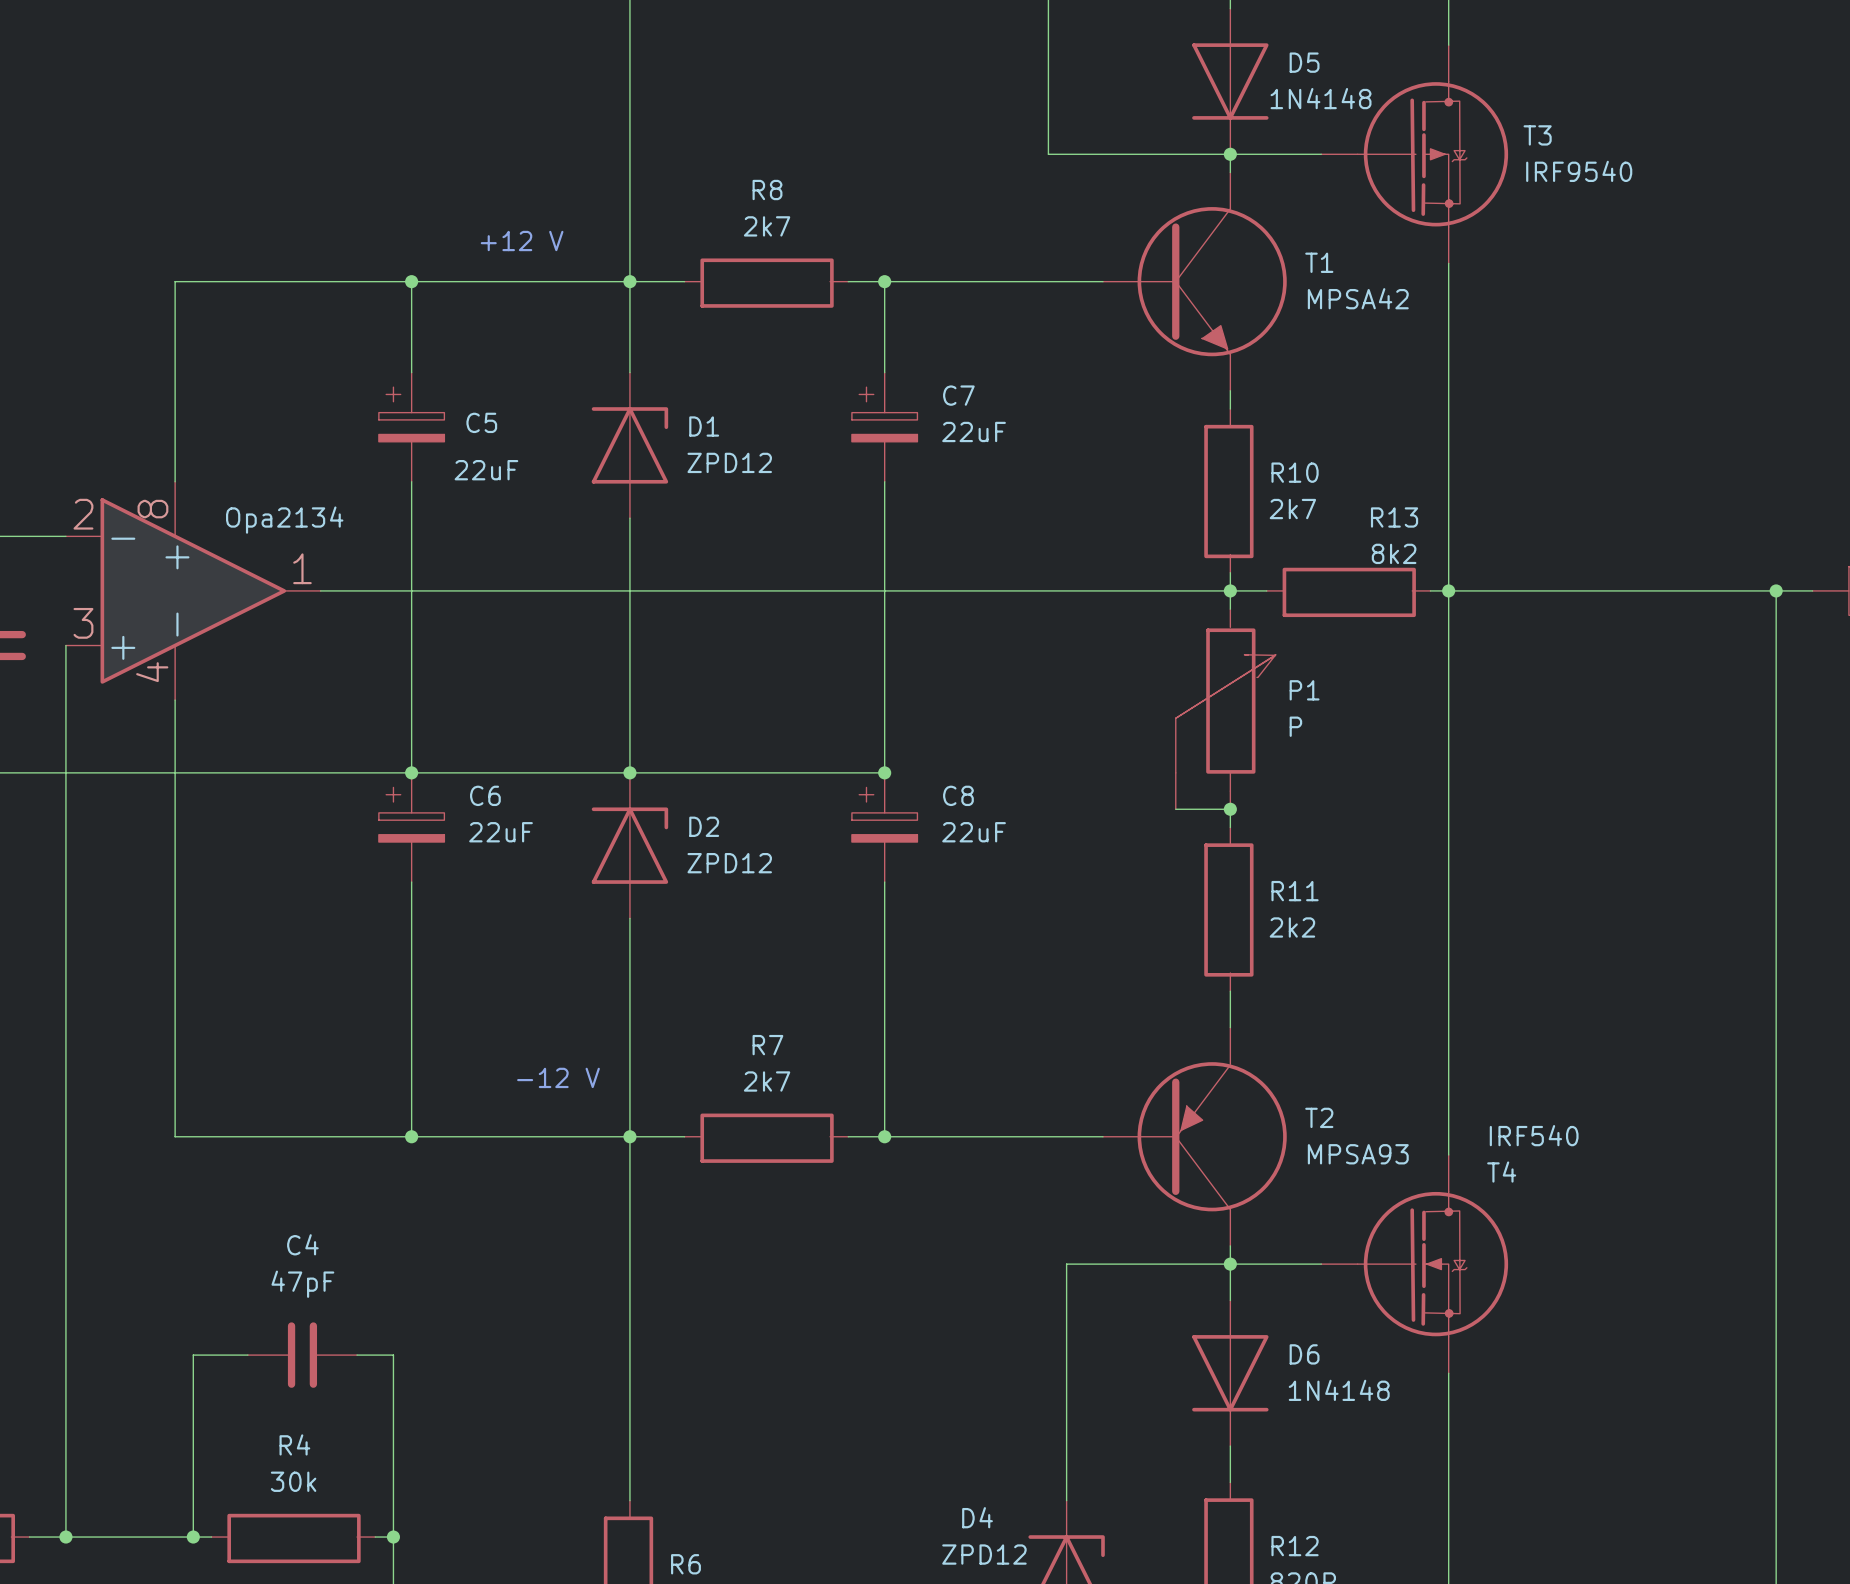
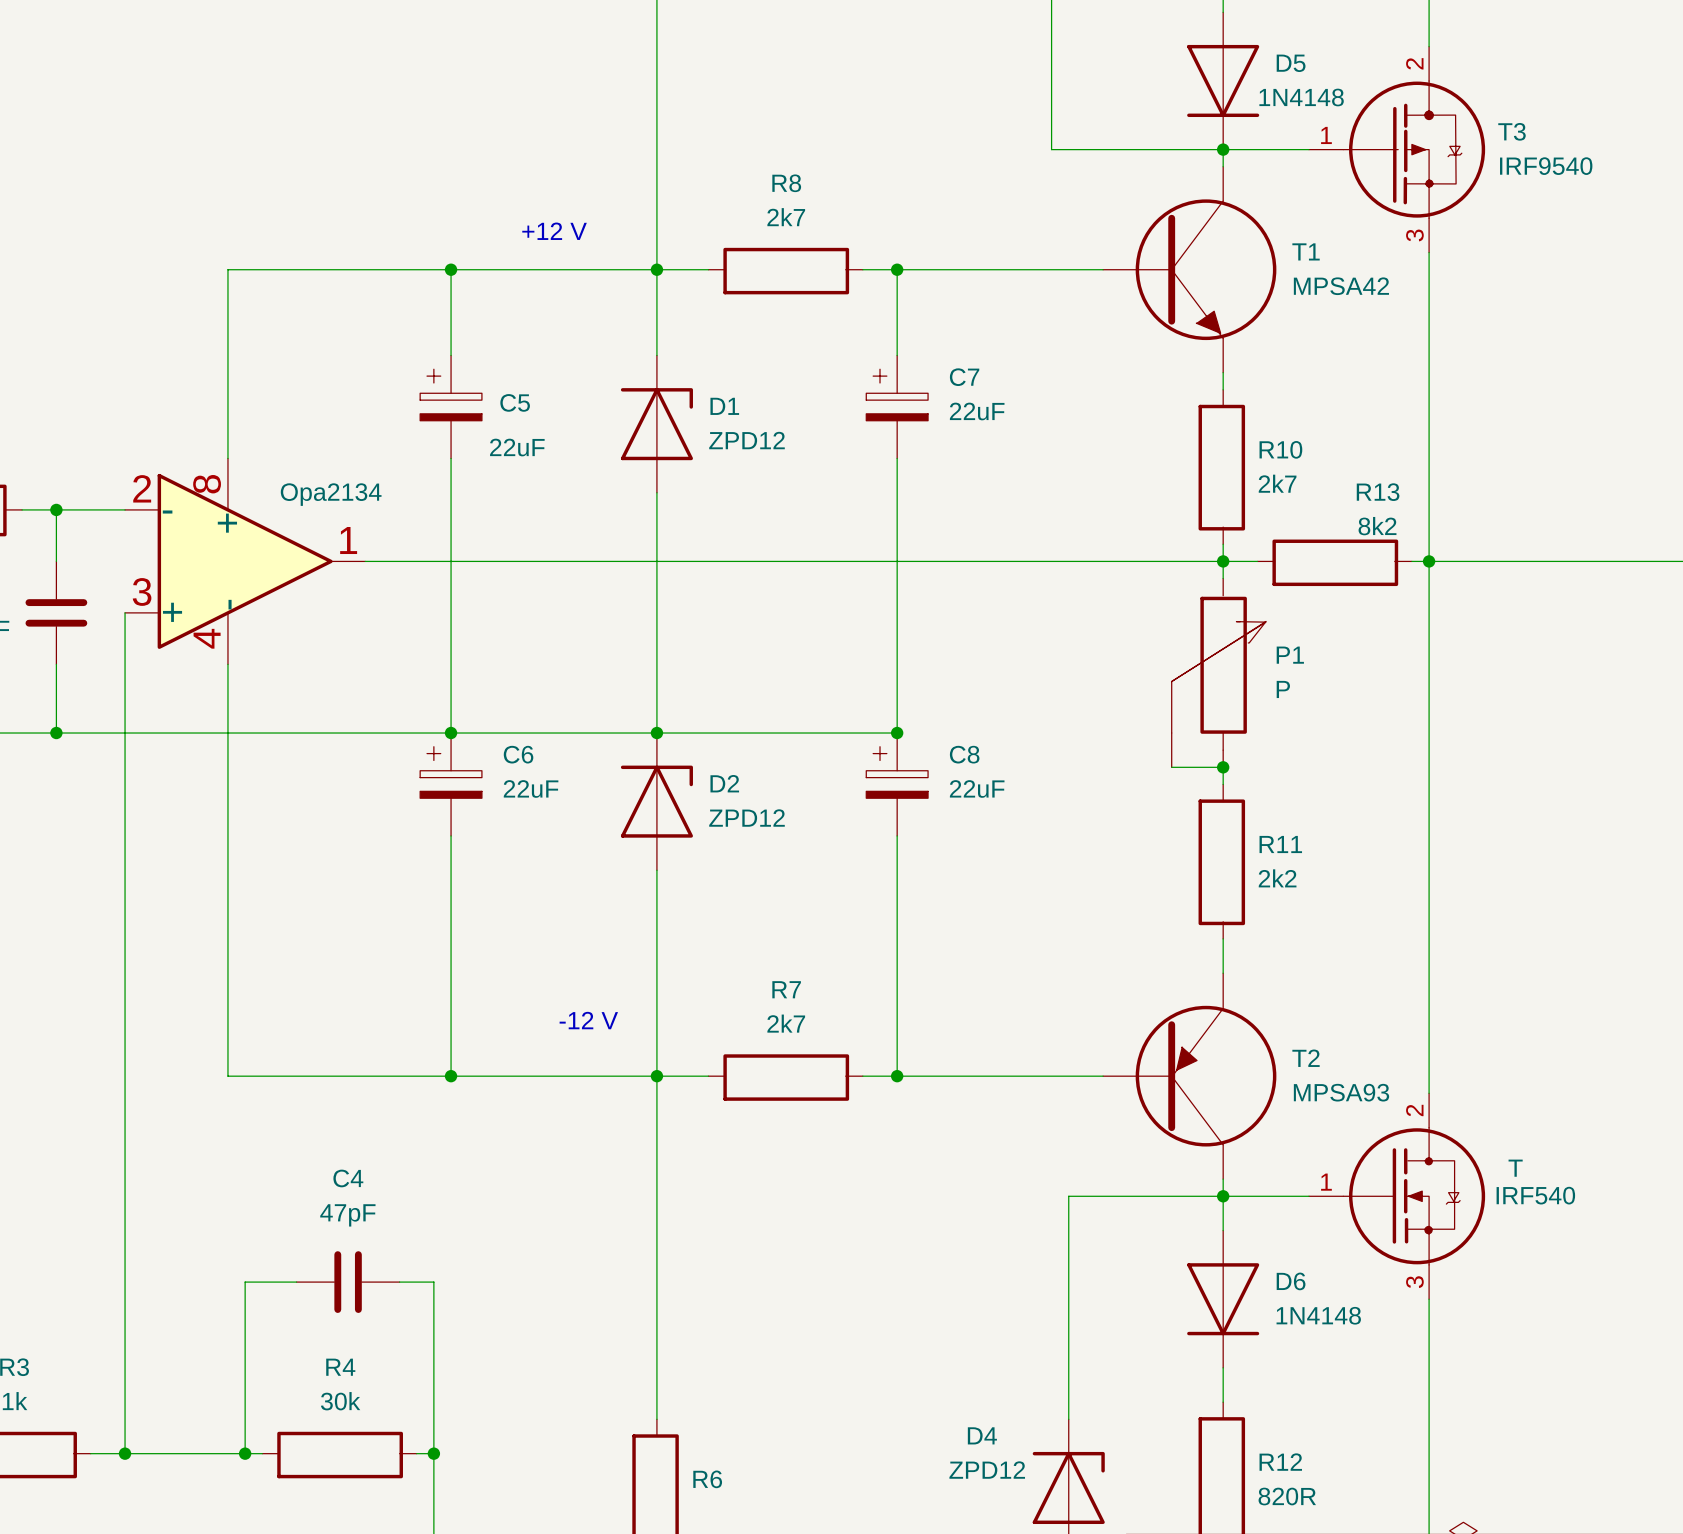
T3 symbol: [1321, 45, 1509, 264] -> [1308, 46, 1486, 253]
T4: IRF540 (1414, 1264) -> none
T: none -> IRF540 (1397, 1196)

